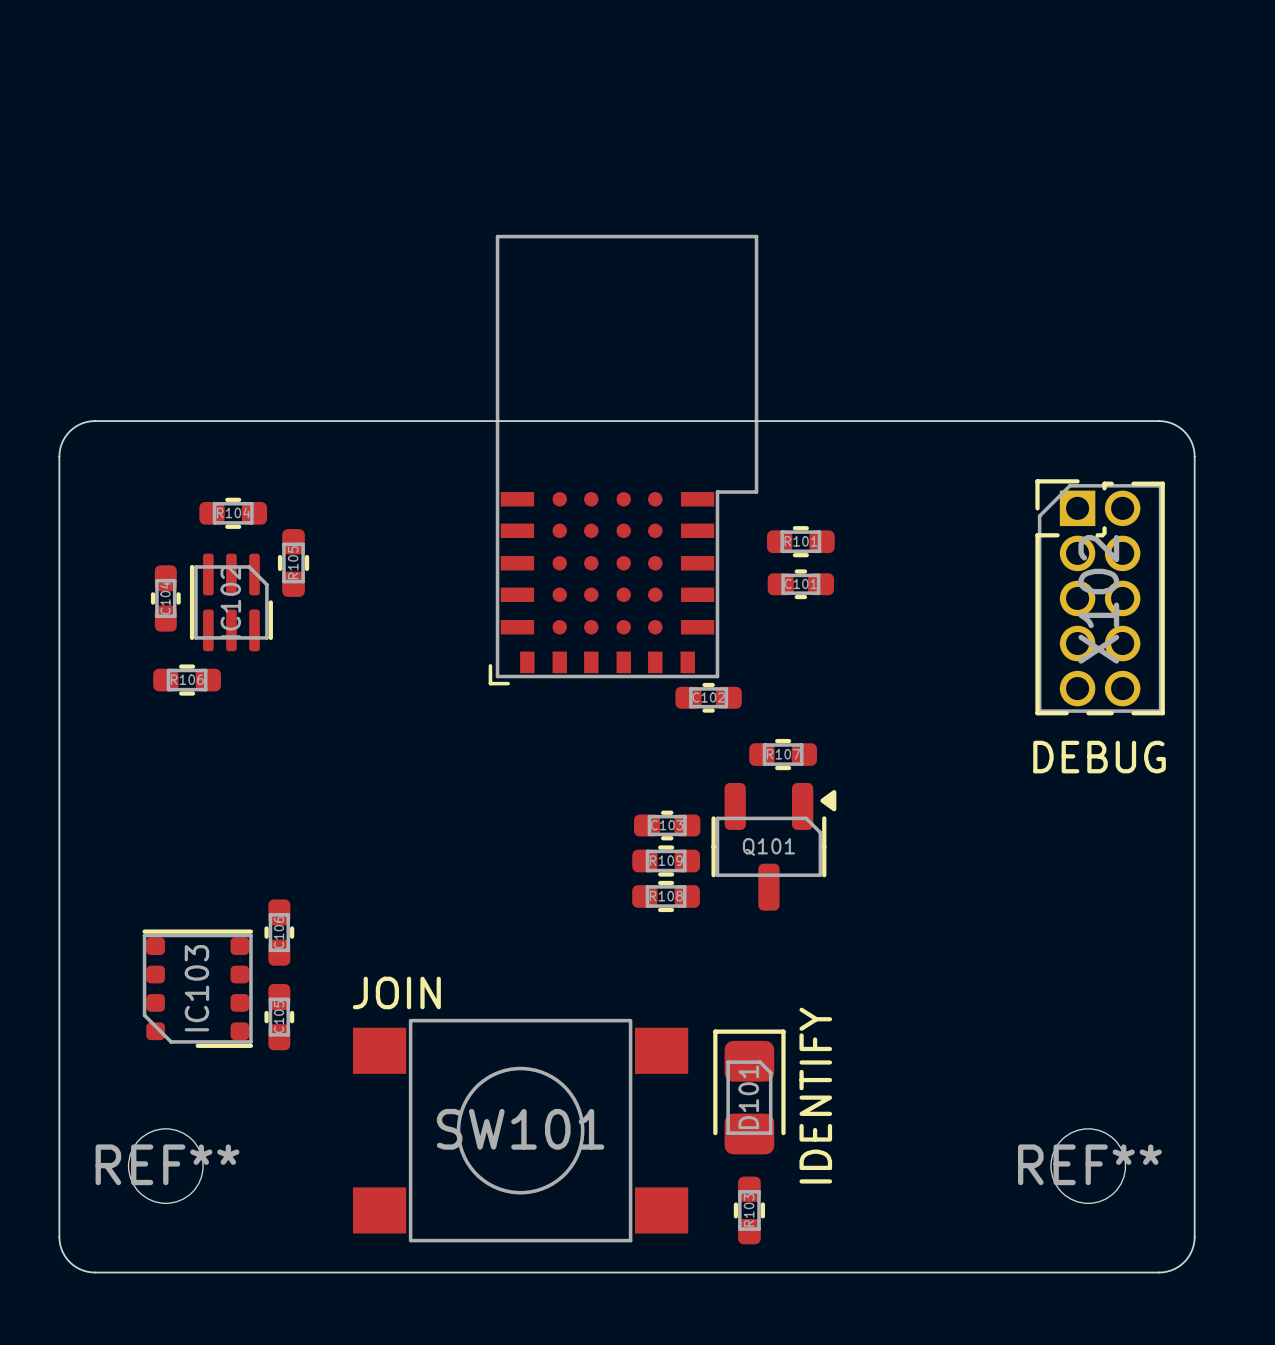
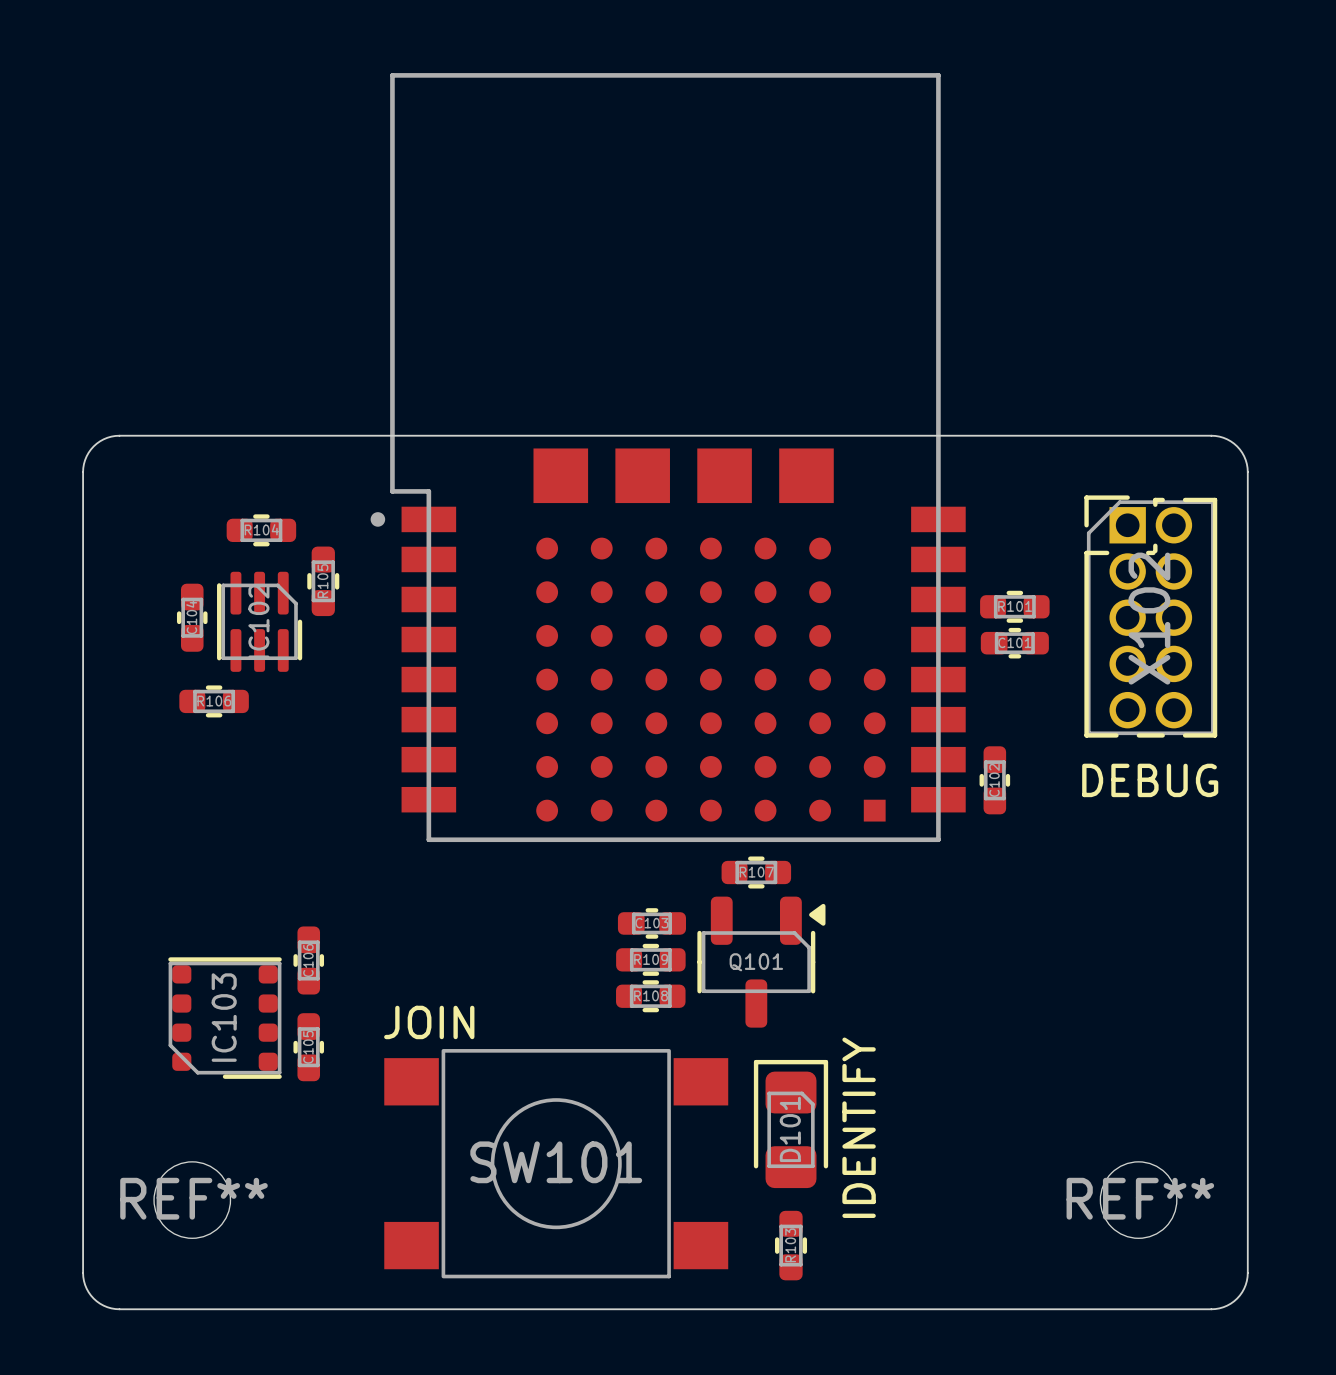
part footprint: [488, 234, 759, 686] -> [370, 73, 966, 843]
R101 position: (800, 541) -> (1014, 606)
C101 position: (800, 584) -> (1014, 643)
C102 rotation: 0° (708, 697) -> 90° clockwise (994, 780)
C102 position: (708, 697) -> (994, 780)
R107 position: (783, 754) -> (756, 872)
C103 position: (667, 825) -> (651, 923)
Q101 position: (773, 846) -> (761, 962)
R109 position: (666, 860) -> (650, 959)
R108 position: (666, 896) -> (650, 996)

